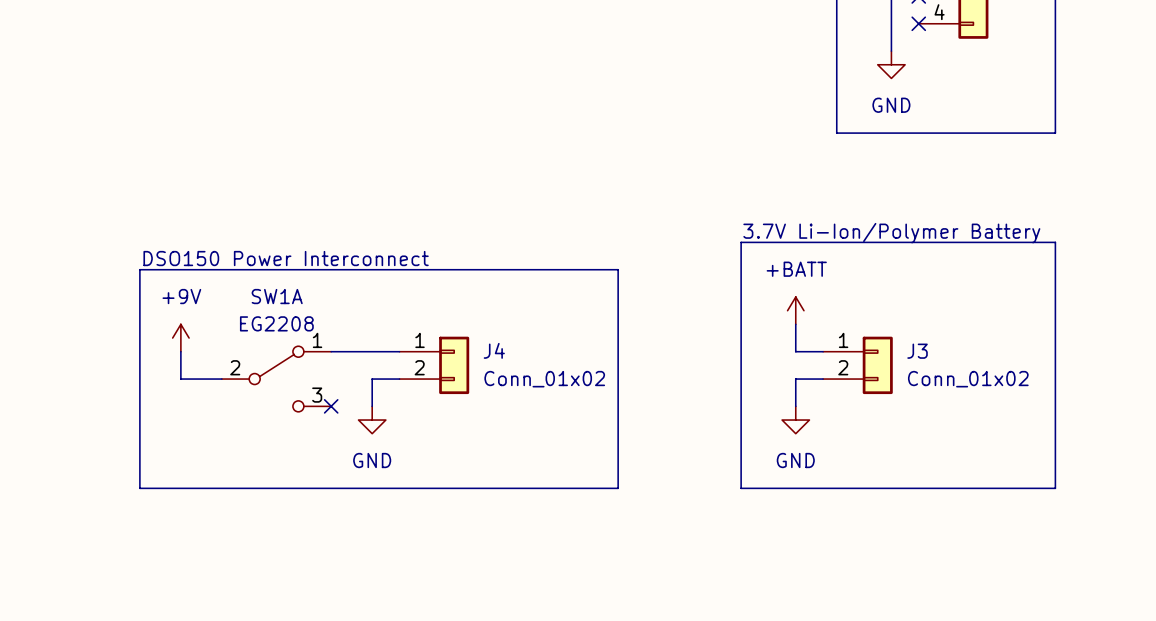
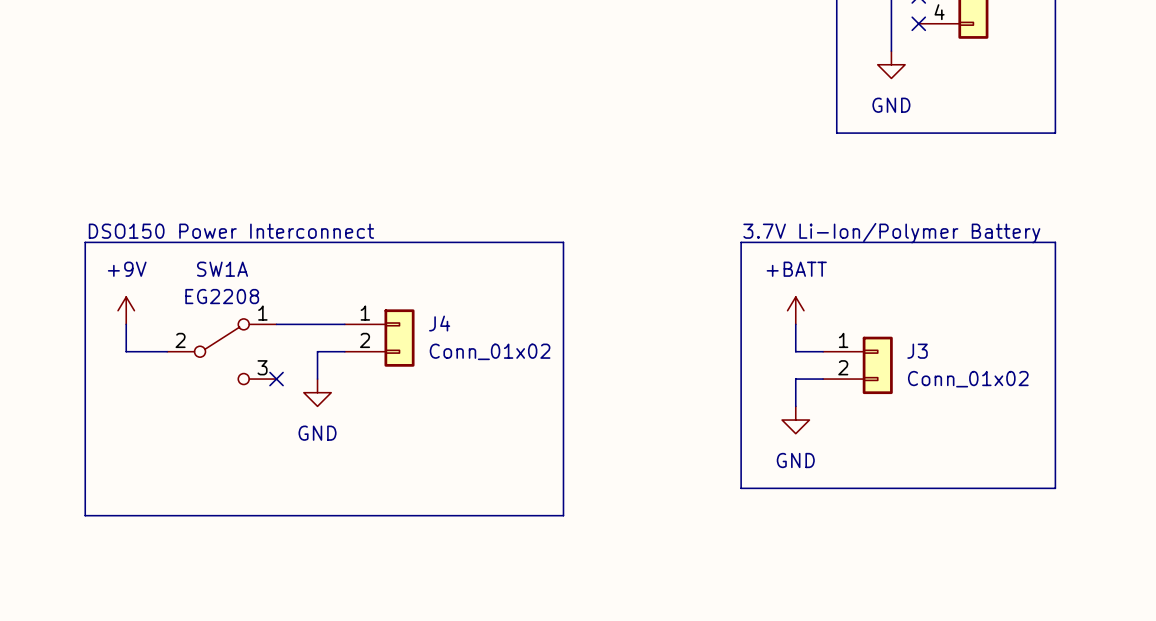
text position: DSO150 Power Interconnect (286, 258) -> DSO150 Power Interconnect (231, 231)
line: (139, 269) (618, 269) (618, 488) (139, 488) (139, 269) -> (85, 242) (85, 515) (563, 515) (563, 242) (85, 242)
wire: none -> (276, 324) (344, 324)
power symbol position: +9V (180, 338) -> +9V (126, 310)
wire: (180, 351) (180, 379) (221, 379) -> (126, 324) (126, 351) (167, 351)
wire: none -> (331, 351) (317, 351) (317, 379)
J4 position: (434, 365) -> (379, 338)
SW1A position: (276, 379) -> (221, 351)
wire: (399, 379) (372, 379) (372, 406) -> none
no-connect mark position: (331, 406) -> (276, 379)
power symbol position: GND (372, 420) -> GND (317, 392)

